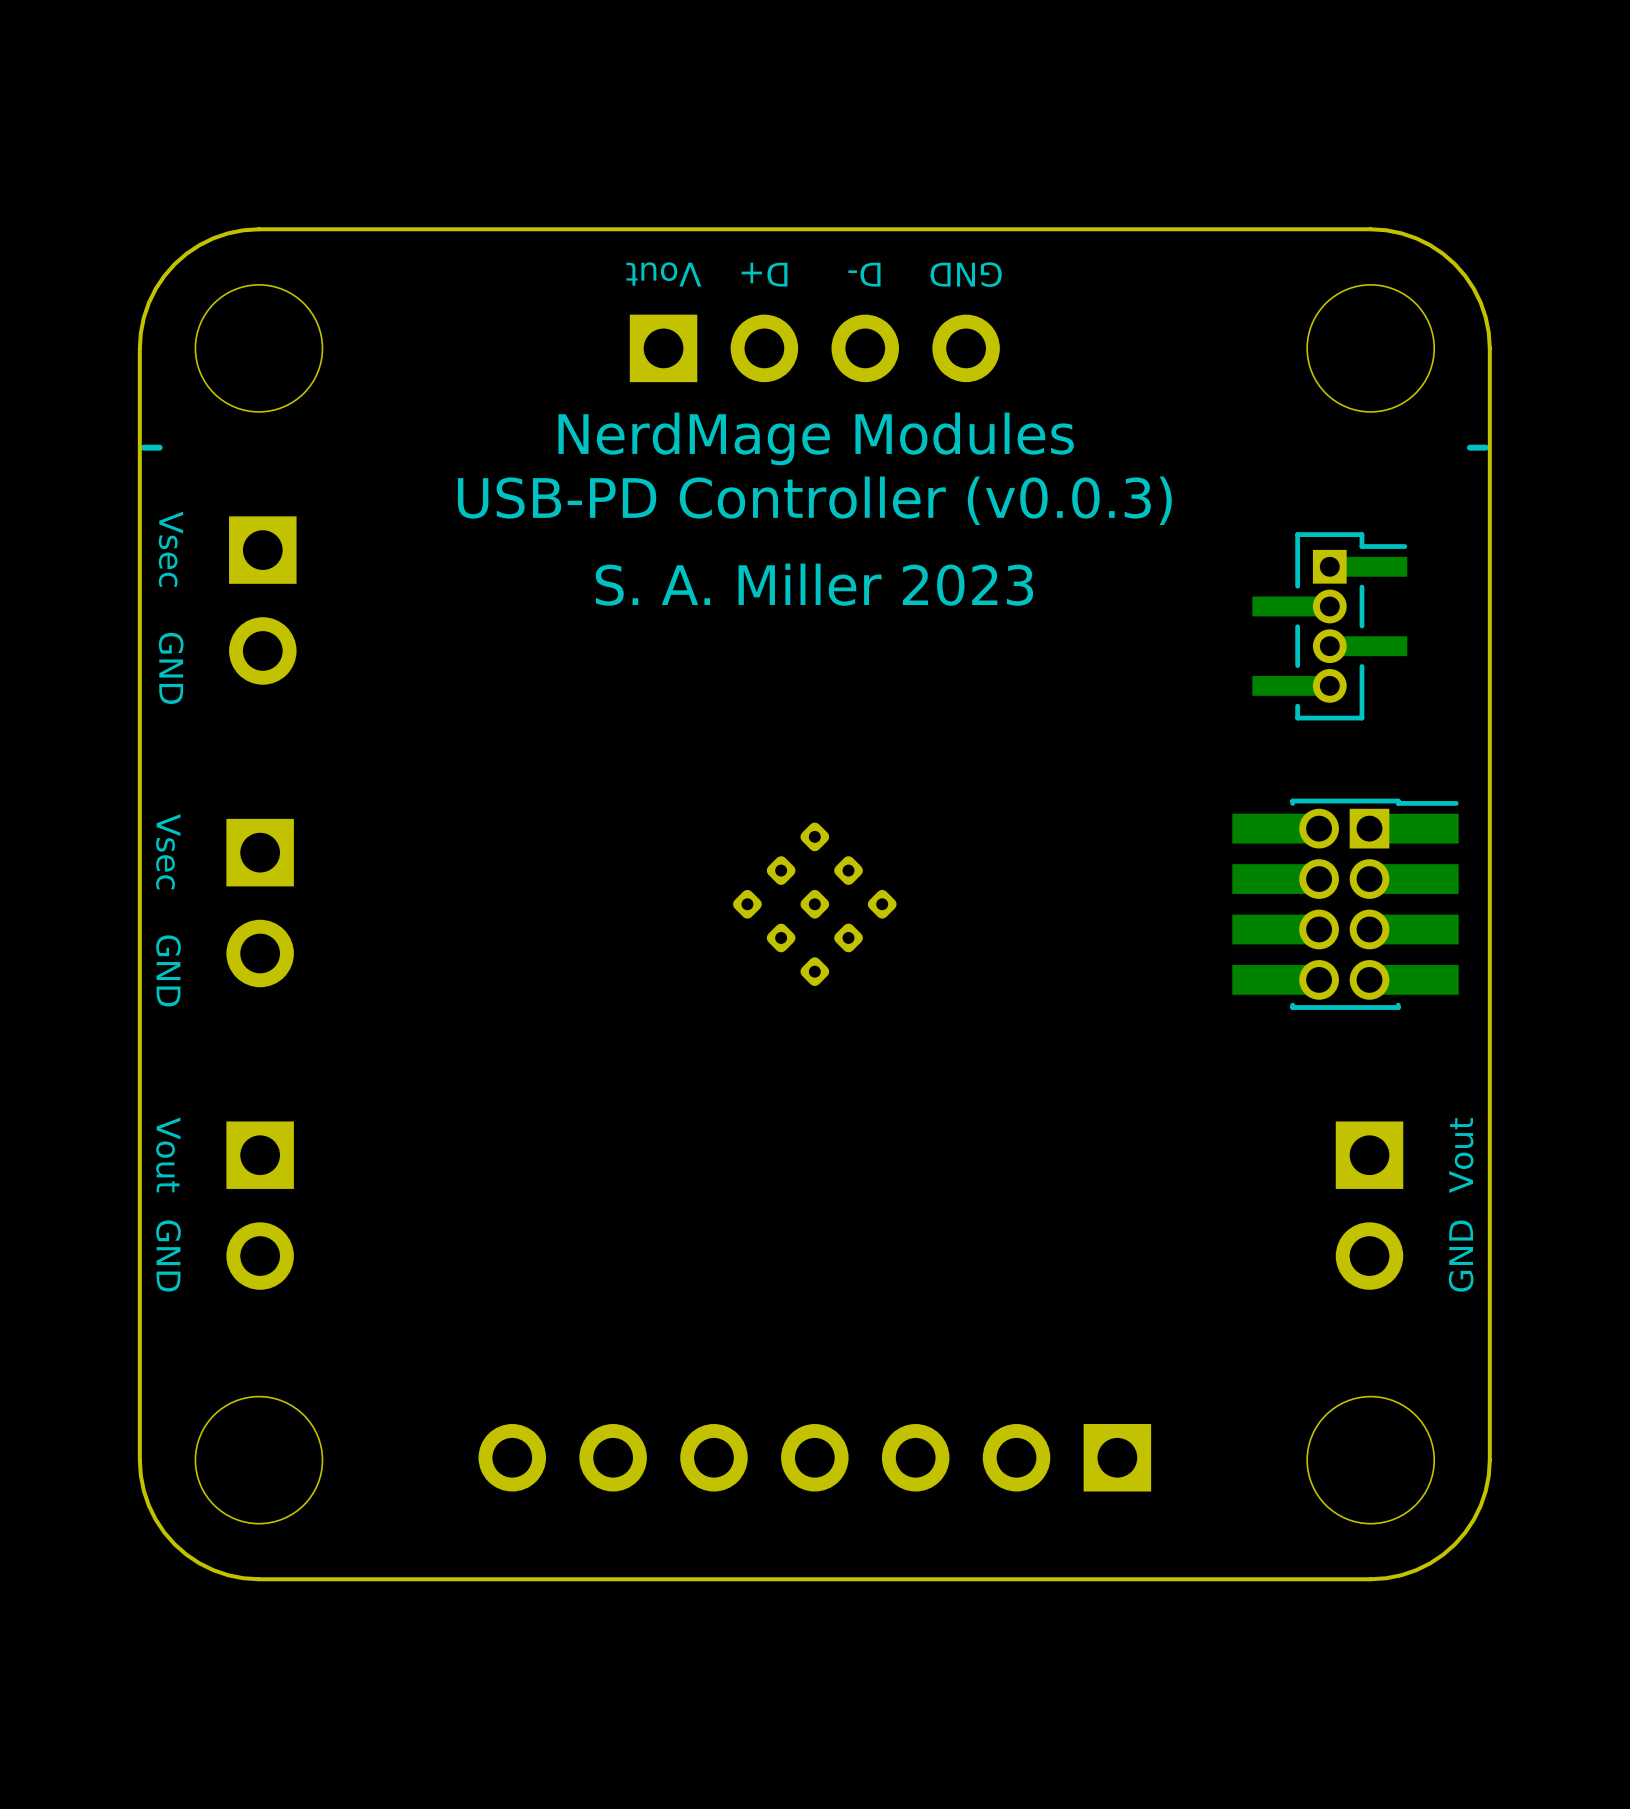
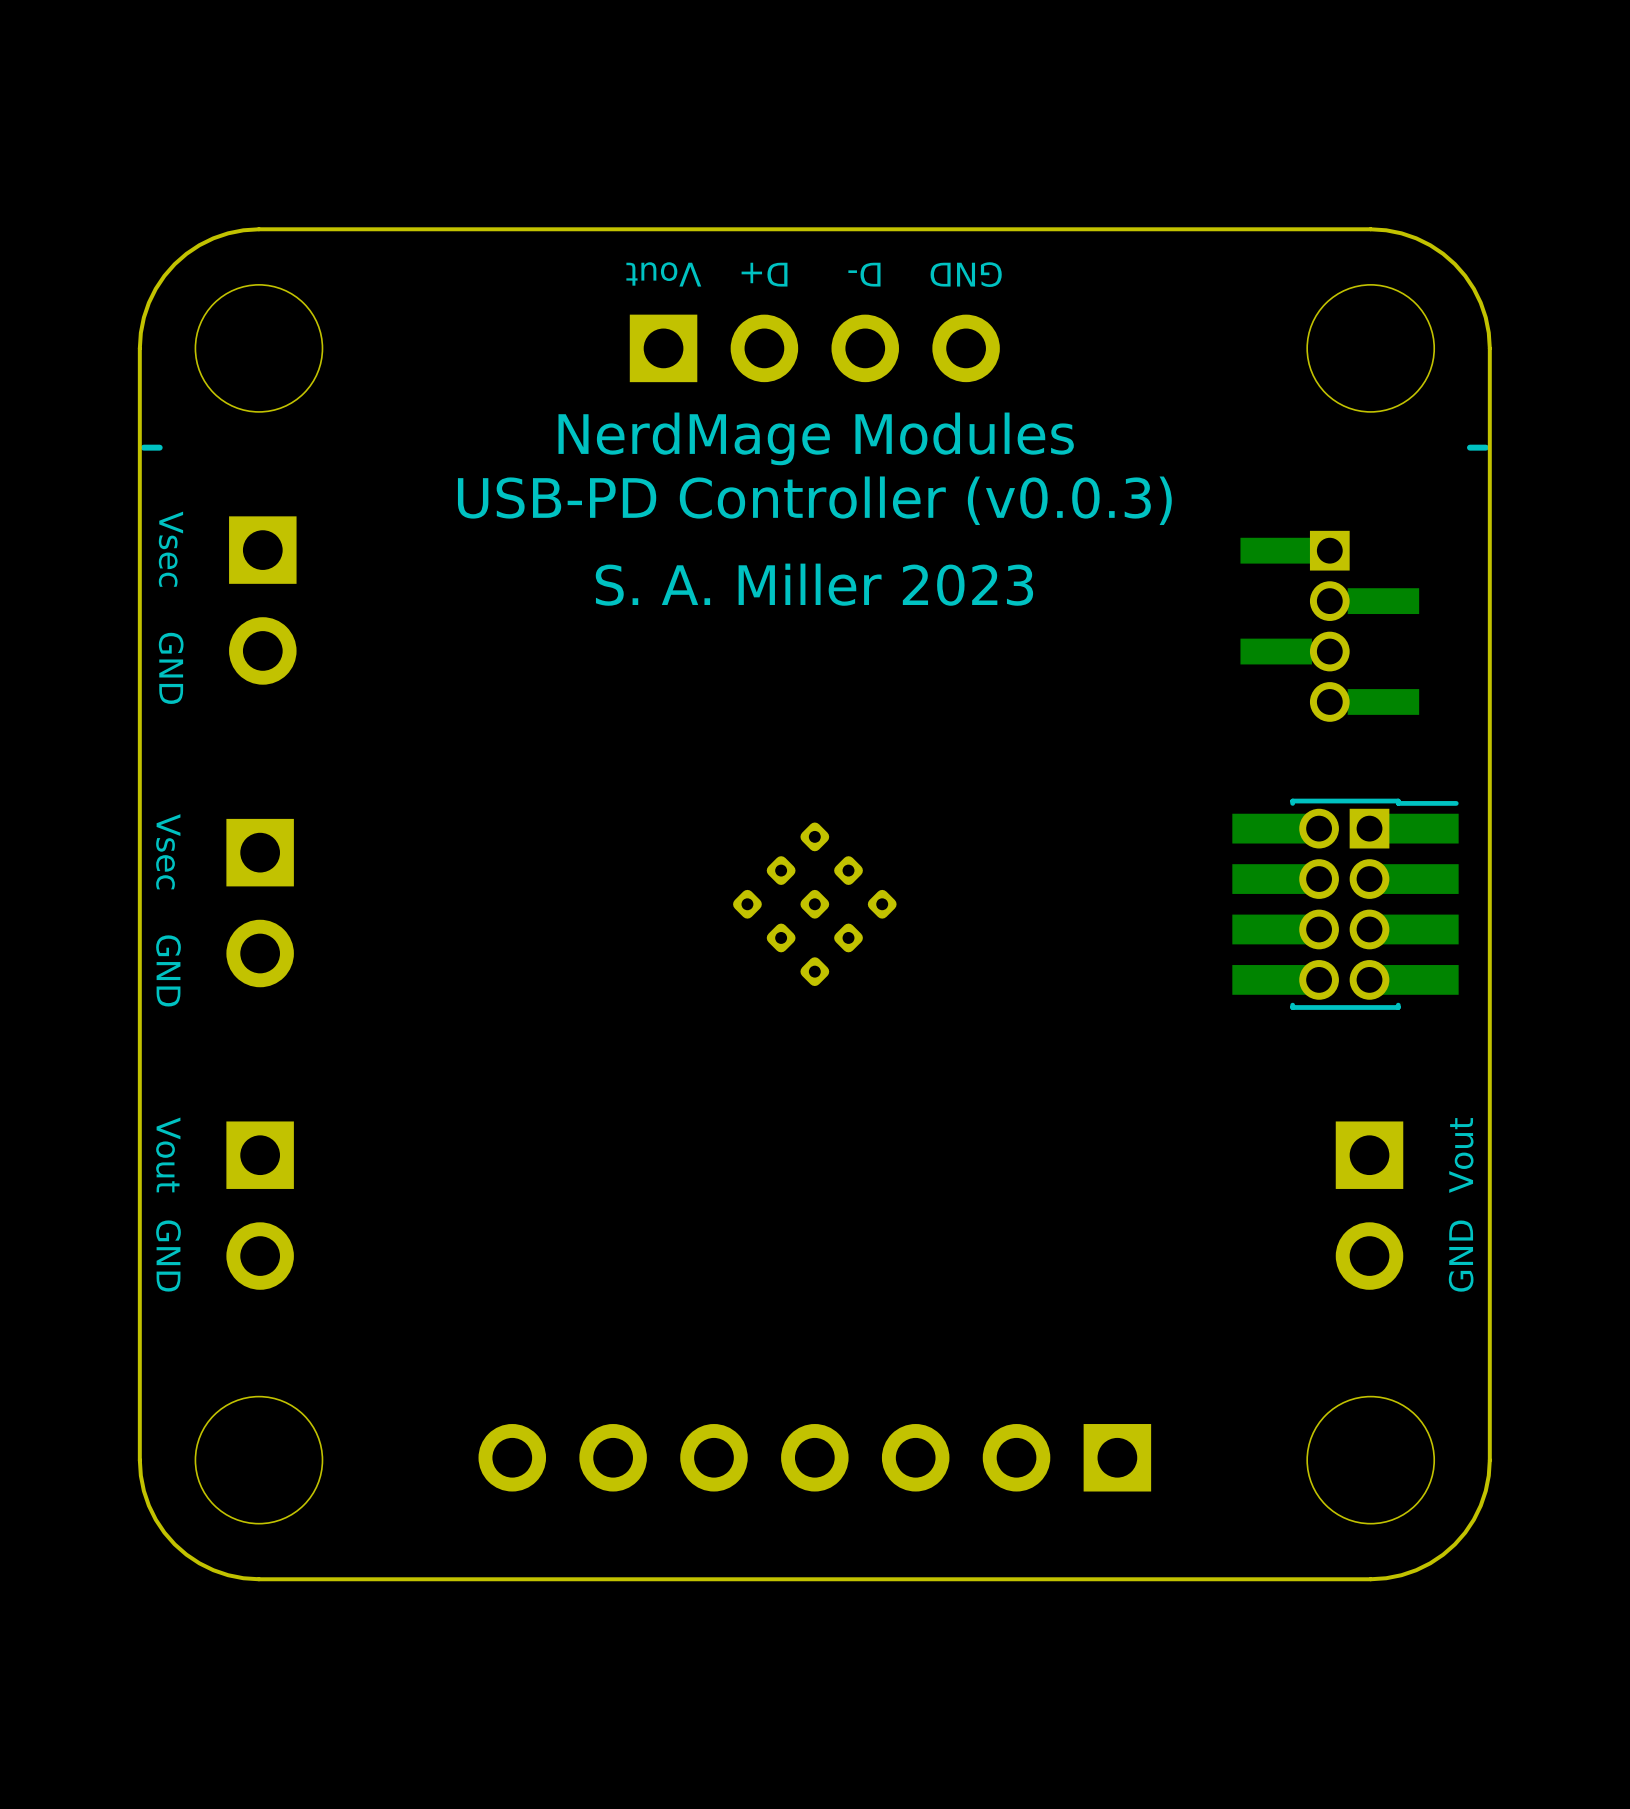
part footprint: [1252, 532, 1408, 721] -> [1240, 530, 1420, 722]

